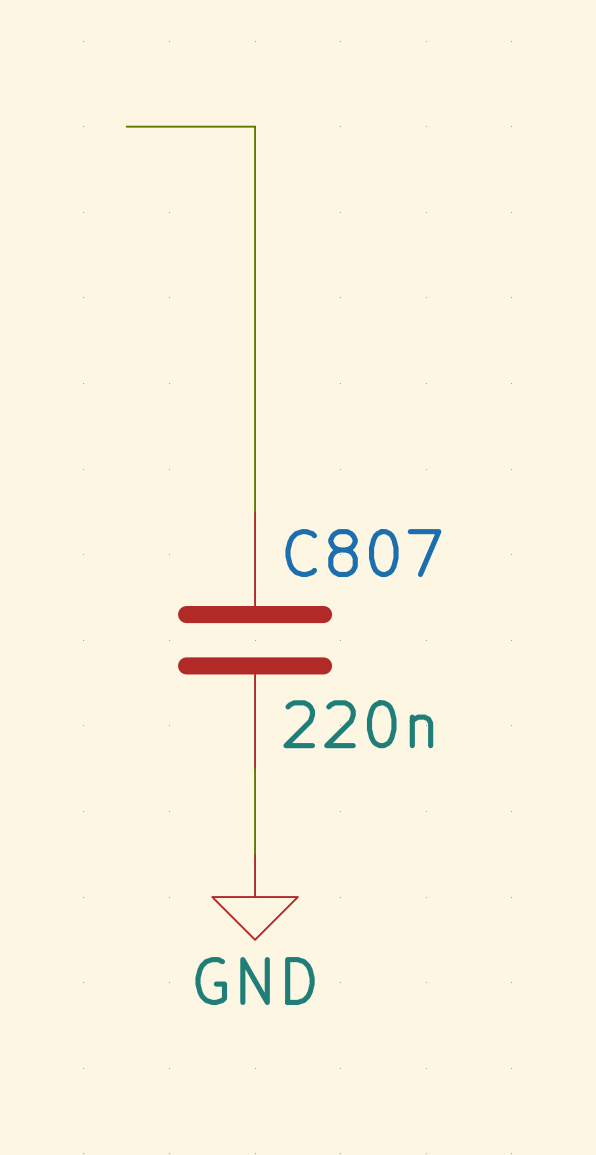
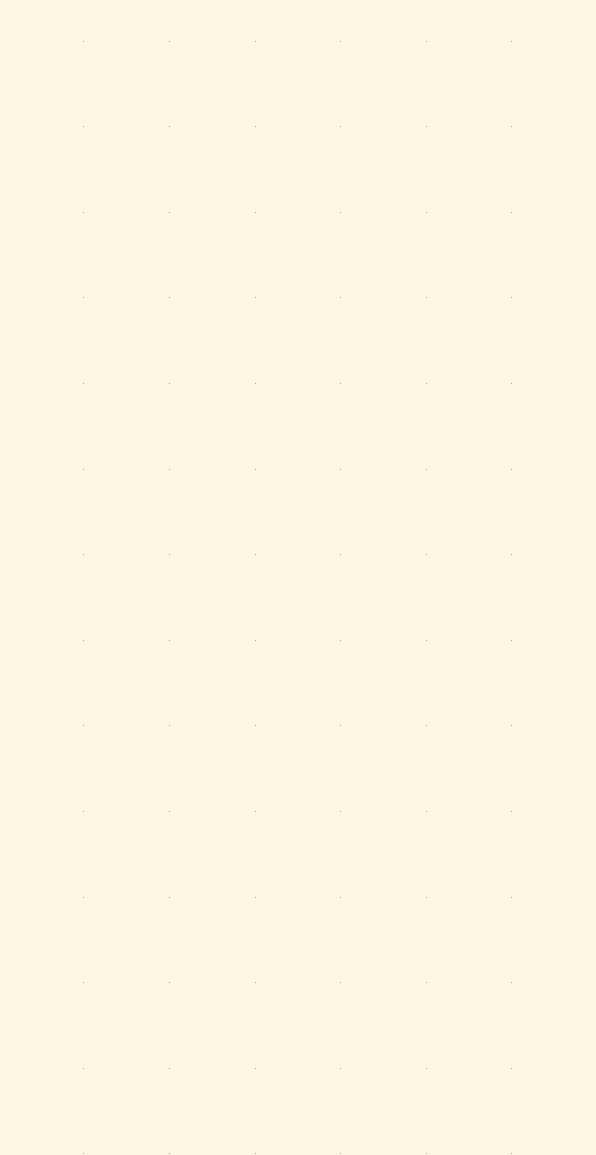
wire: (126, 126) (255, 126) (255, 511) -> none
C807: 220n (255, 640) -> none
wire: (255, 768) (255, 854) -> none
power symbol: GND (255, 897) -> none

